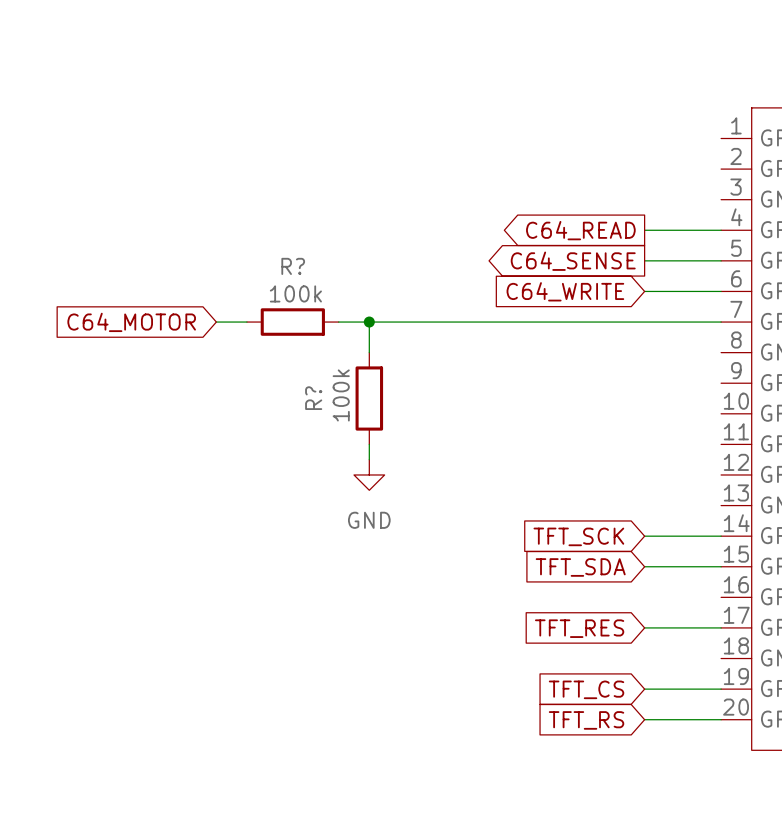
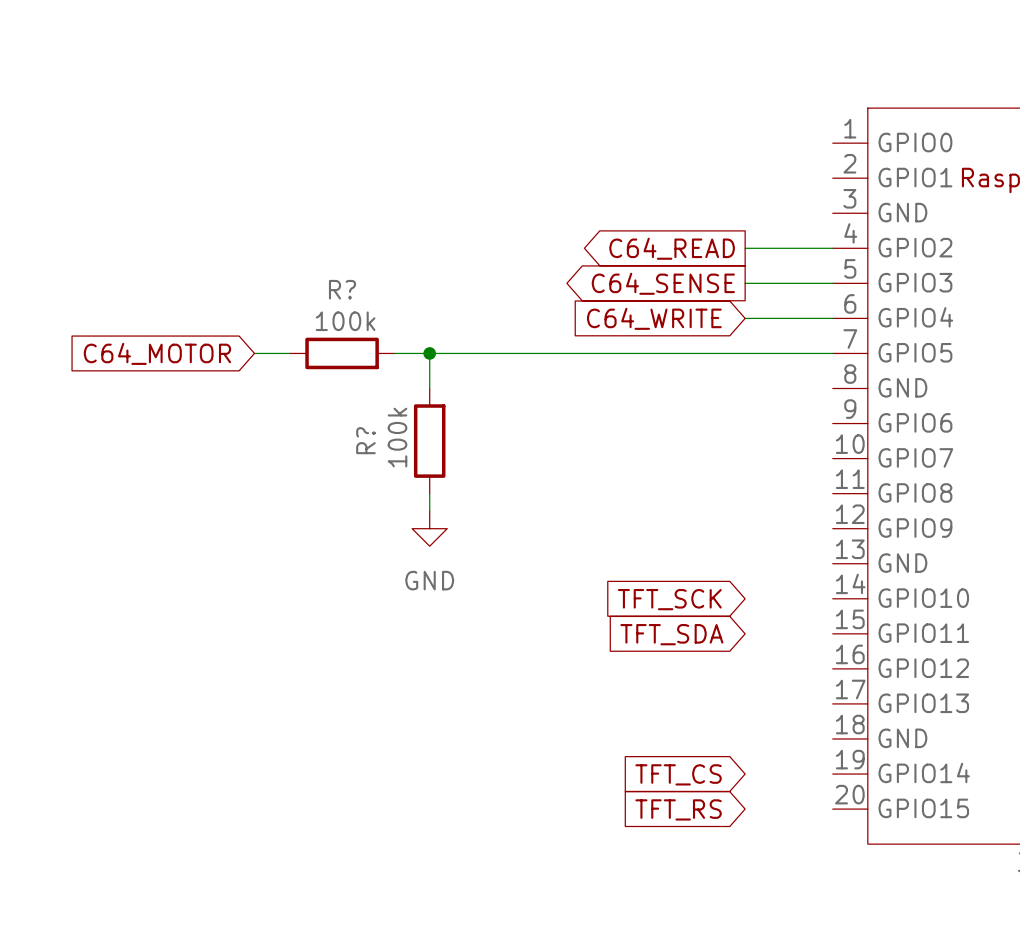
wire: (644, 536) (721, 536) -> none
wire: (644, 566) (721, 566) -> none
wire: (644, 627) (721, 627) -> none
global label: TFT_RES (579, 628) -> none
wire: (644, 689) (721, 689) -> none
wire: (644, 719) (721, 719) -> none

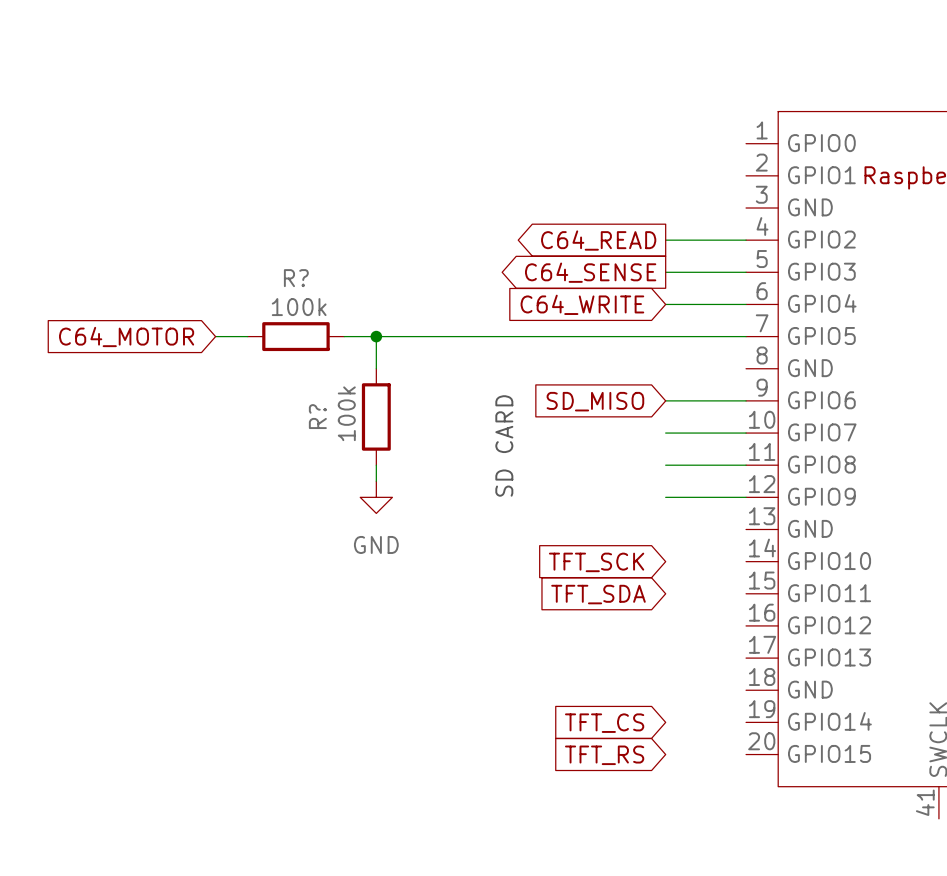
wire: none -> (665, 400) (746, 400)
global label: none -> SD_MISO (595, 401)
wire: none -> (665, 433) (746, 433)
text: none -> SD CARD (504, 445)
wire: none -> (665, 465) (746, 465)
wire: none -> (665, 497) (746, 497)

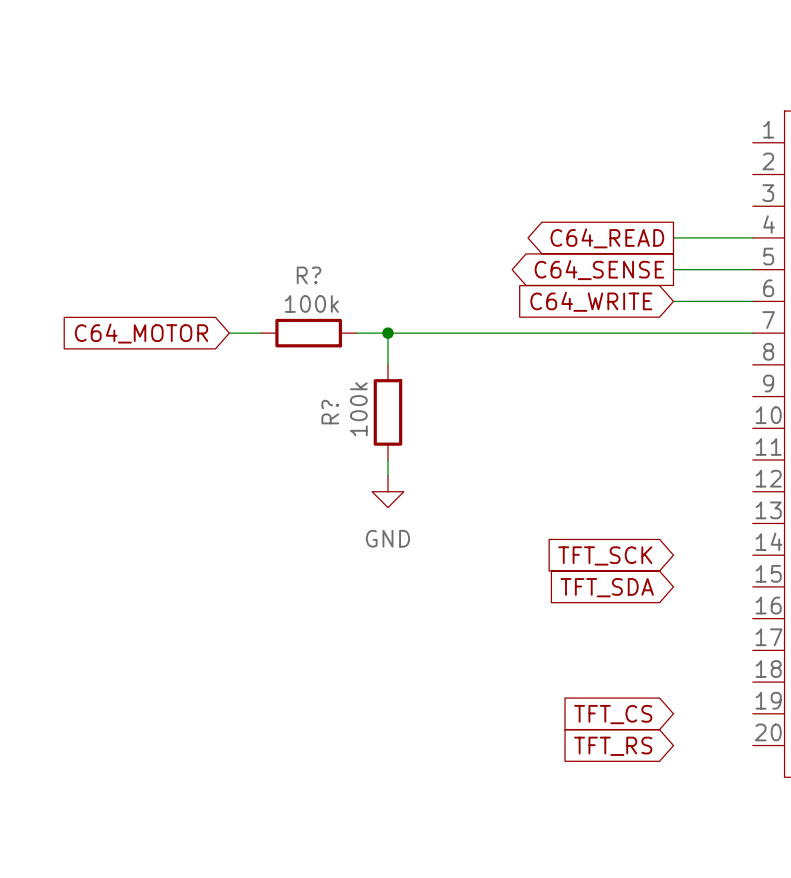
wire: (665, 400) (746, 400) -> none
global label: SD_MISO (595, 401) -> none
wire: (665, 433) (746, 433) -> none
text: SD CARD (504, 445) -> none
wire: (665, 465) (746, 465) -> none
wire: (665, 497) (746, 497) -> none

